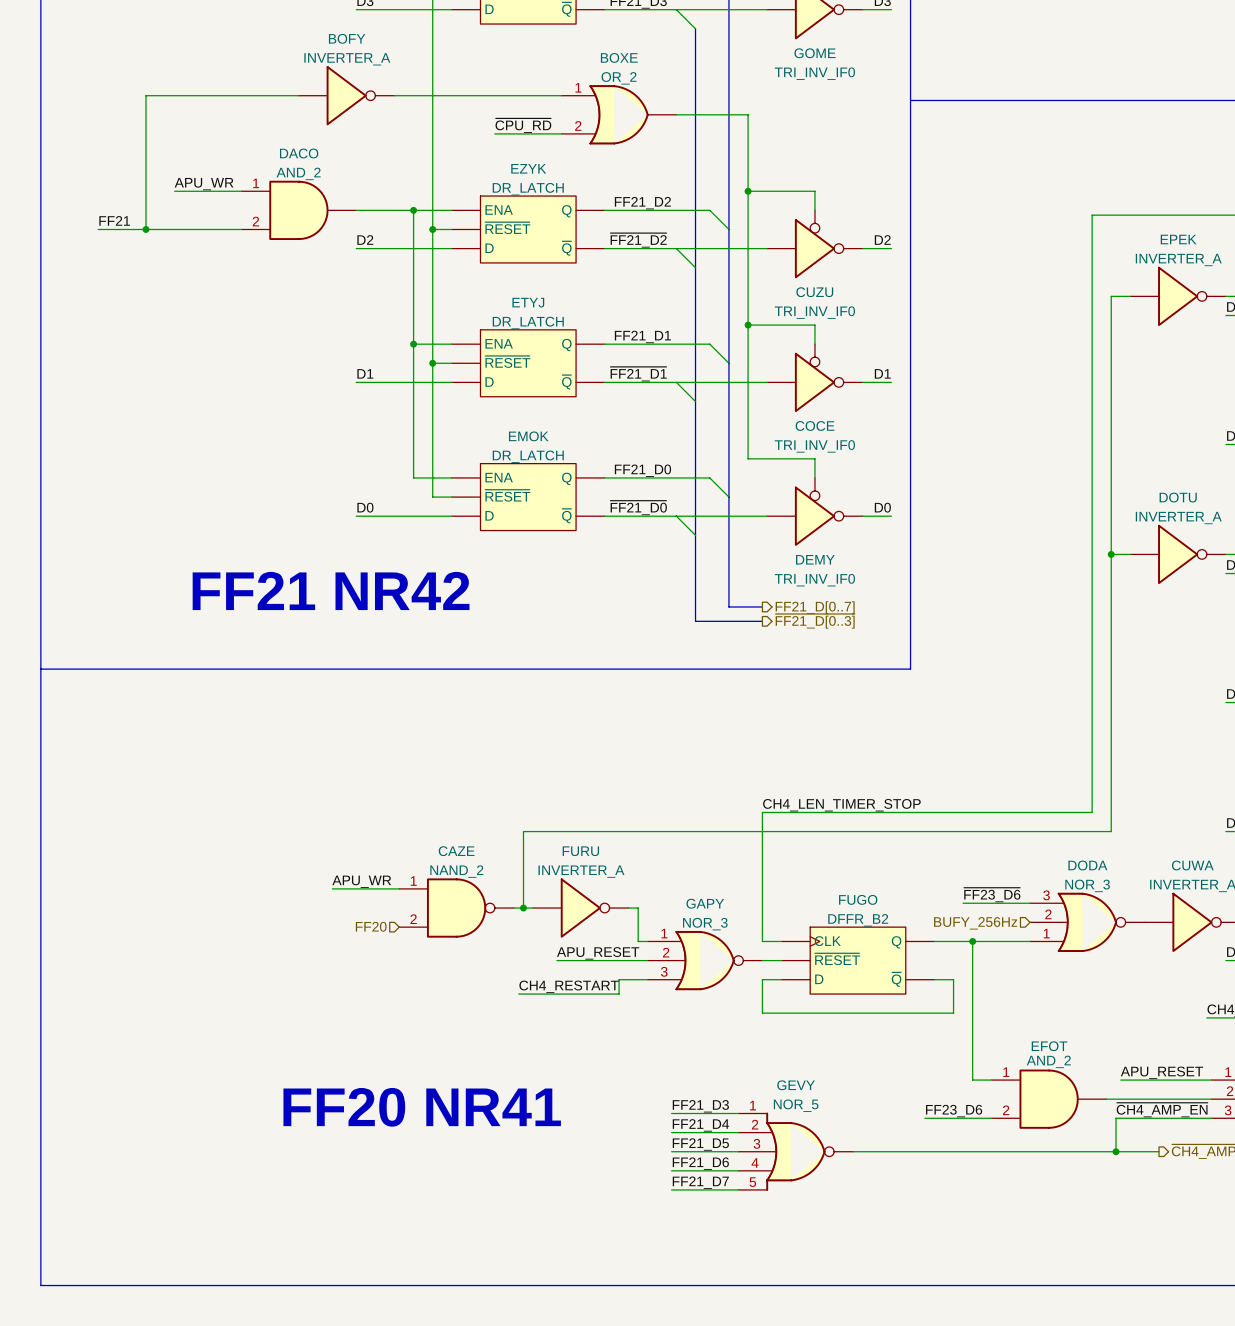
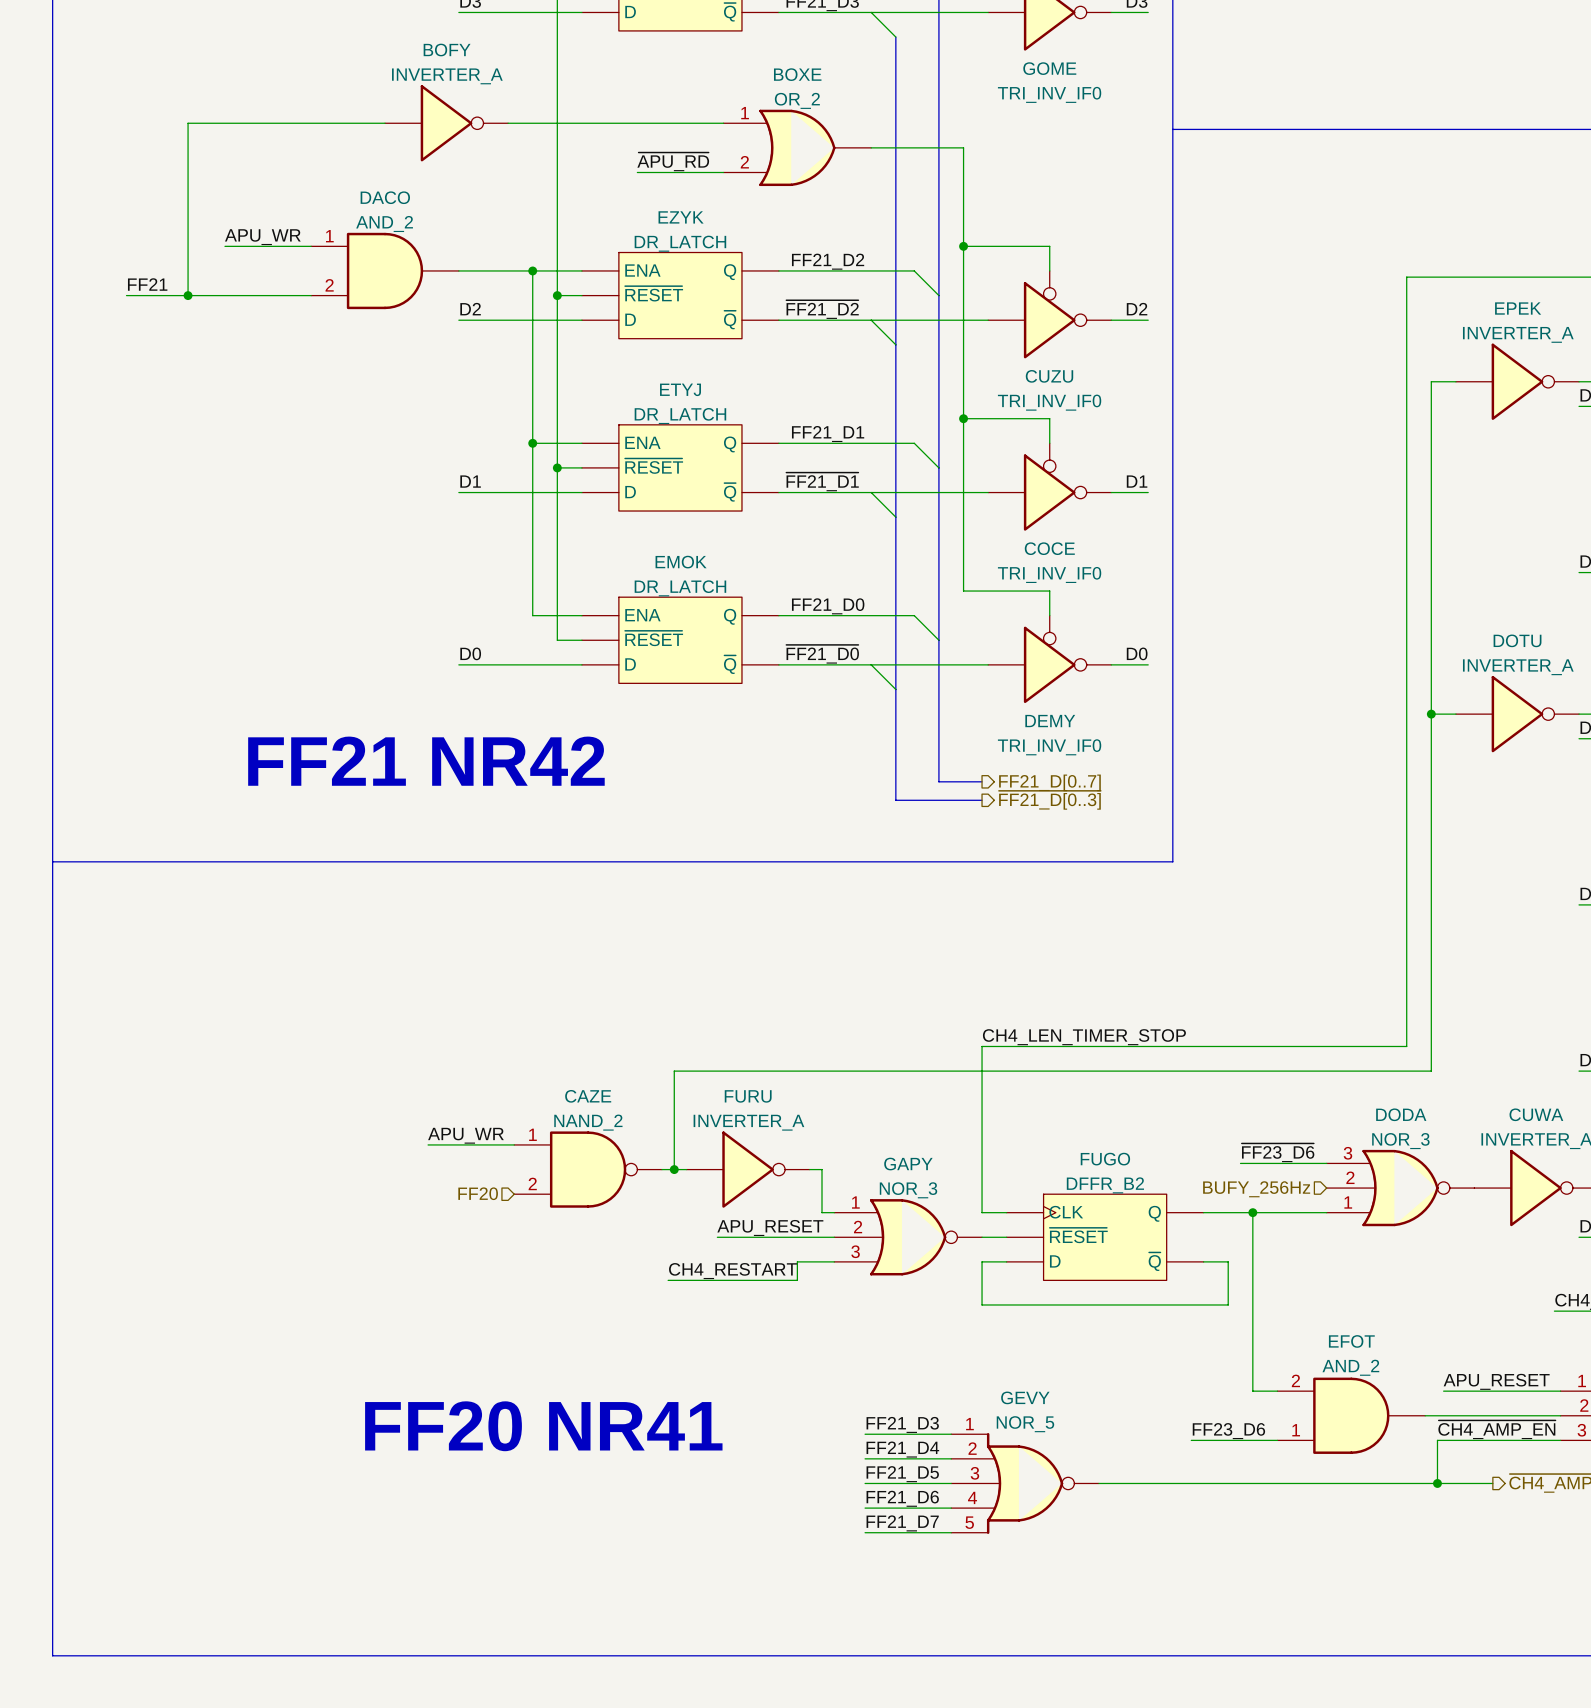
label: ~{CPU_RD} (523, 125) -> ~{APU_RD} (673, 161)
EFOT flip: as is (1049, 1099) -> up-down (1351, 1415)

